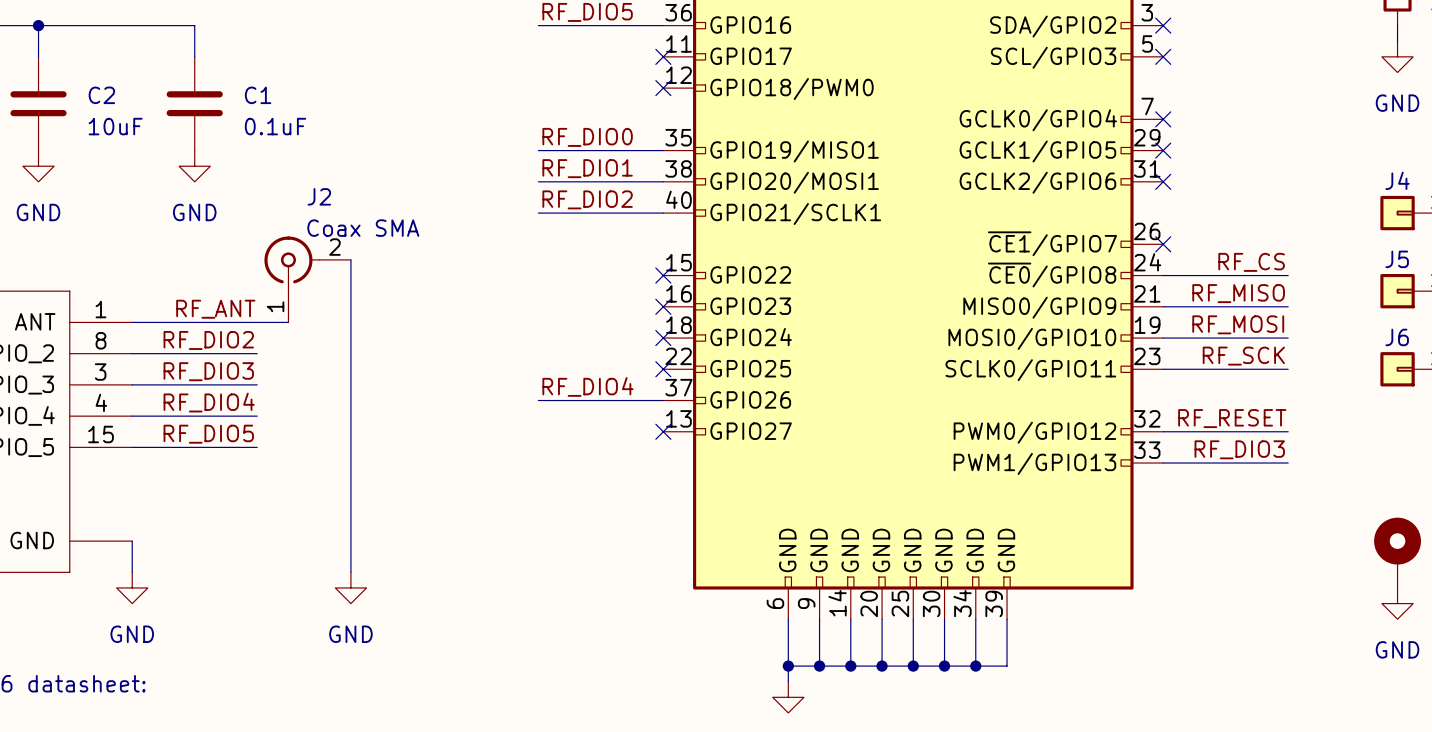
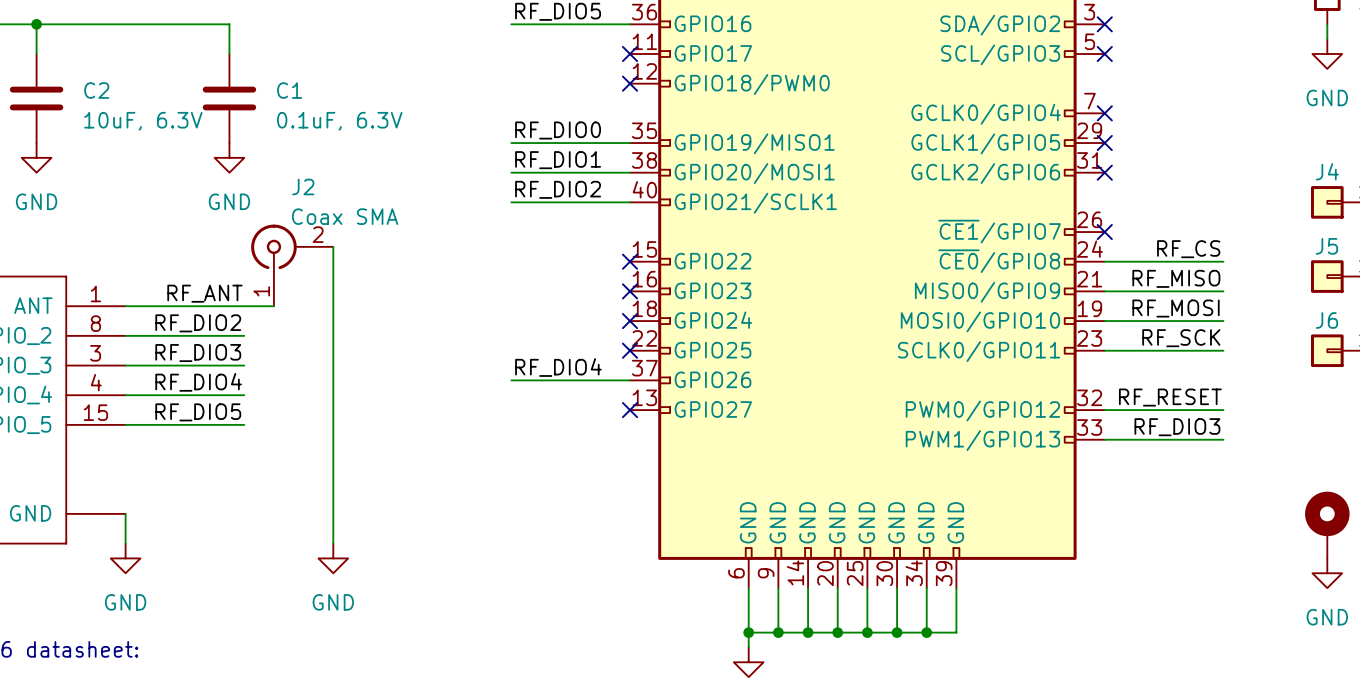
wire: (194, 25) (194, 56) -> (184, 24) (229, 24) (229, 54)
C1 position: (194, 103) -> (229, 98)
C2 value: 10uF (115, 126) -> 10uF, 6.3V (143, 121)
C1 value: 0.1uF (275, 126) -> 0.1uF, 6.3V (339, 121)
power symbol position: GND (194, 166) -> GND (229, 157)

